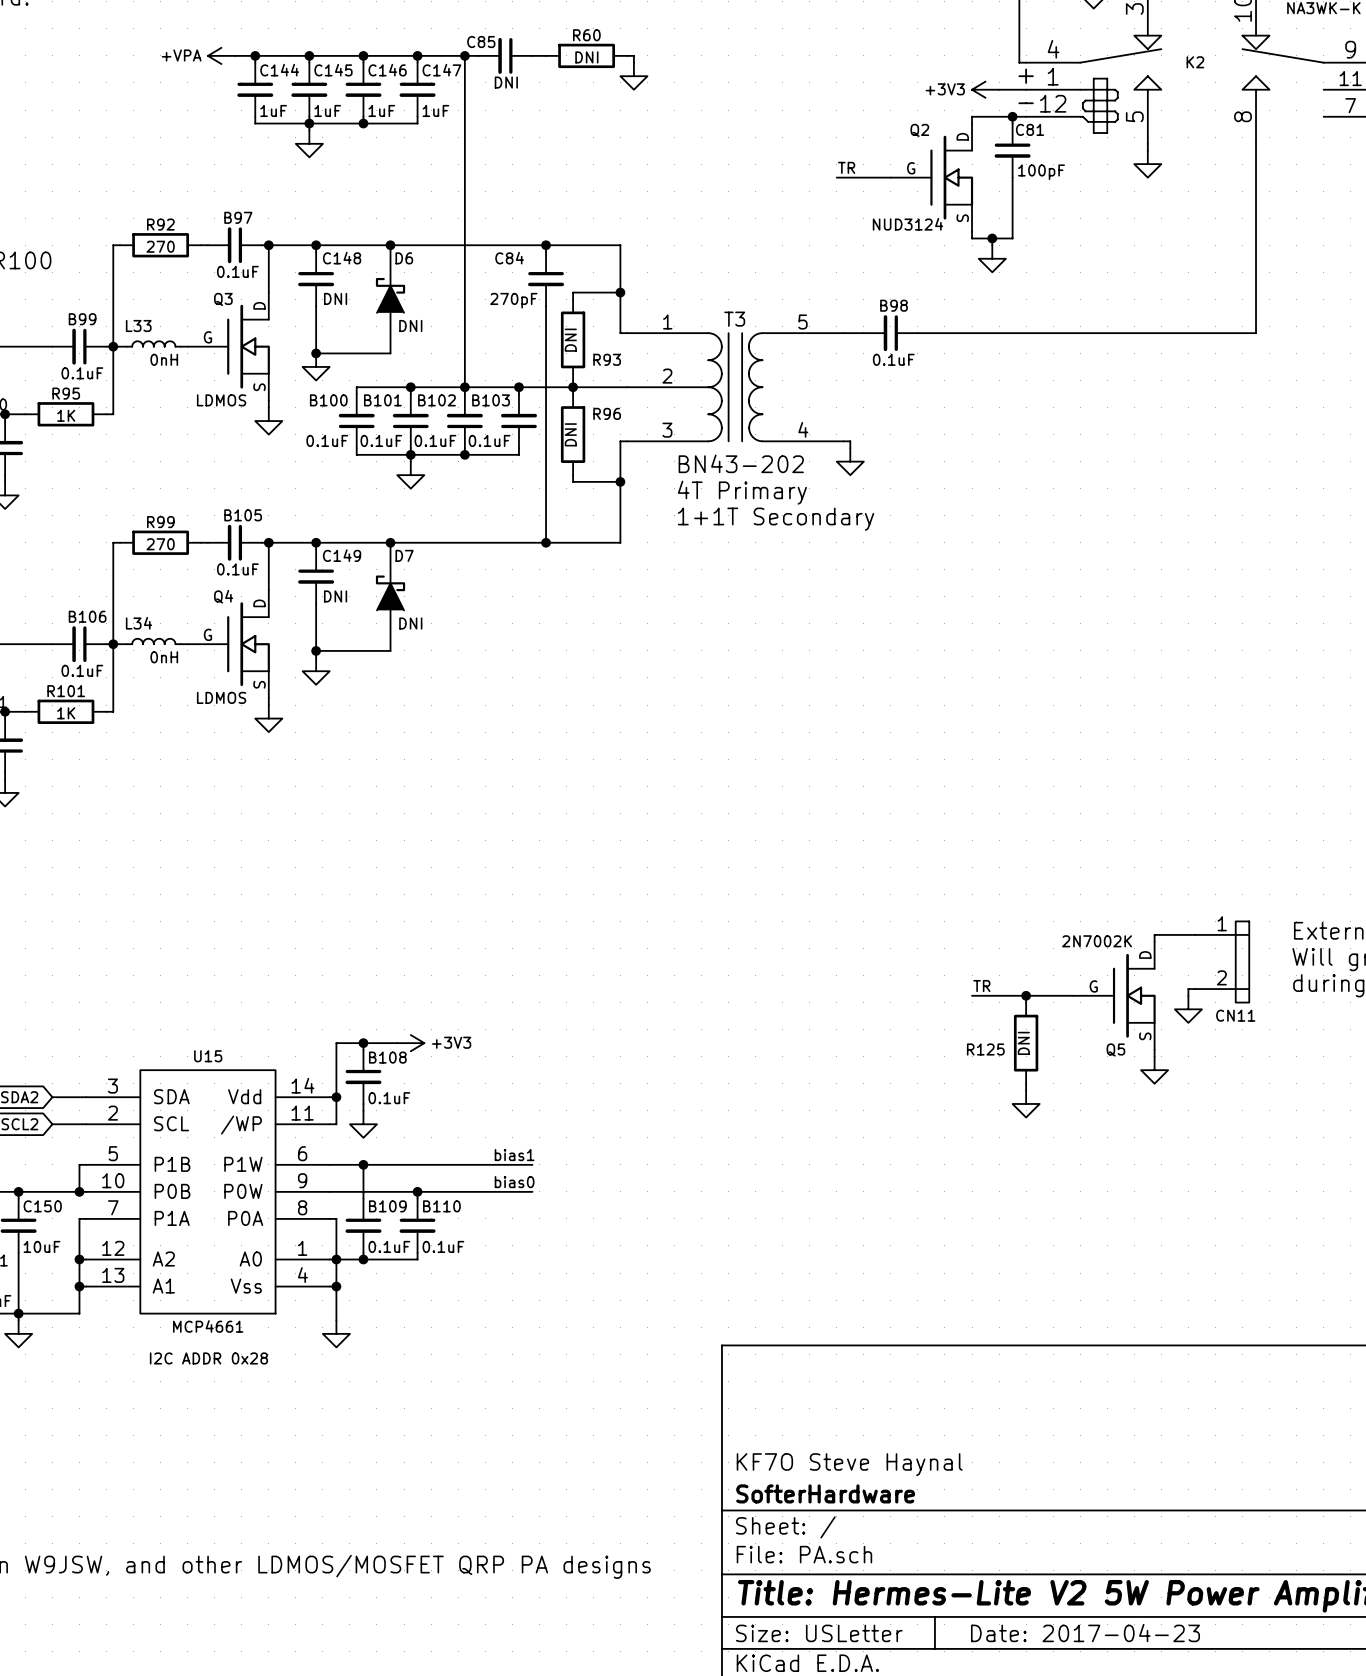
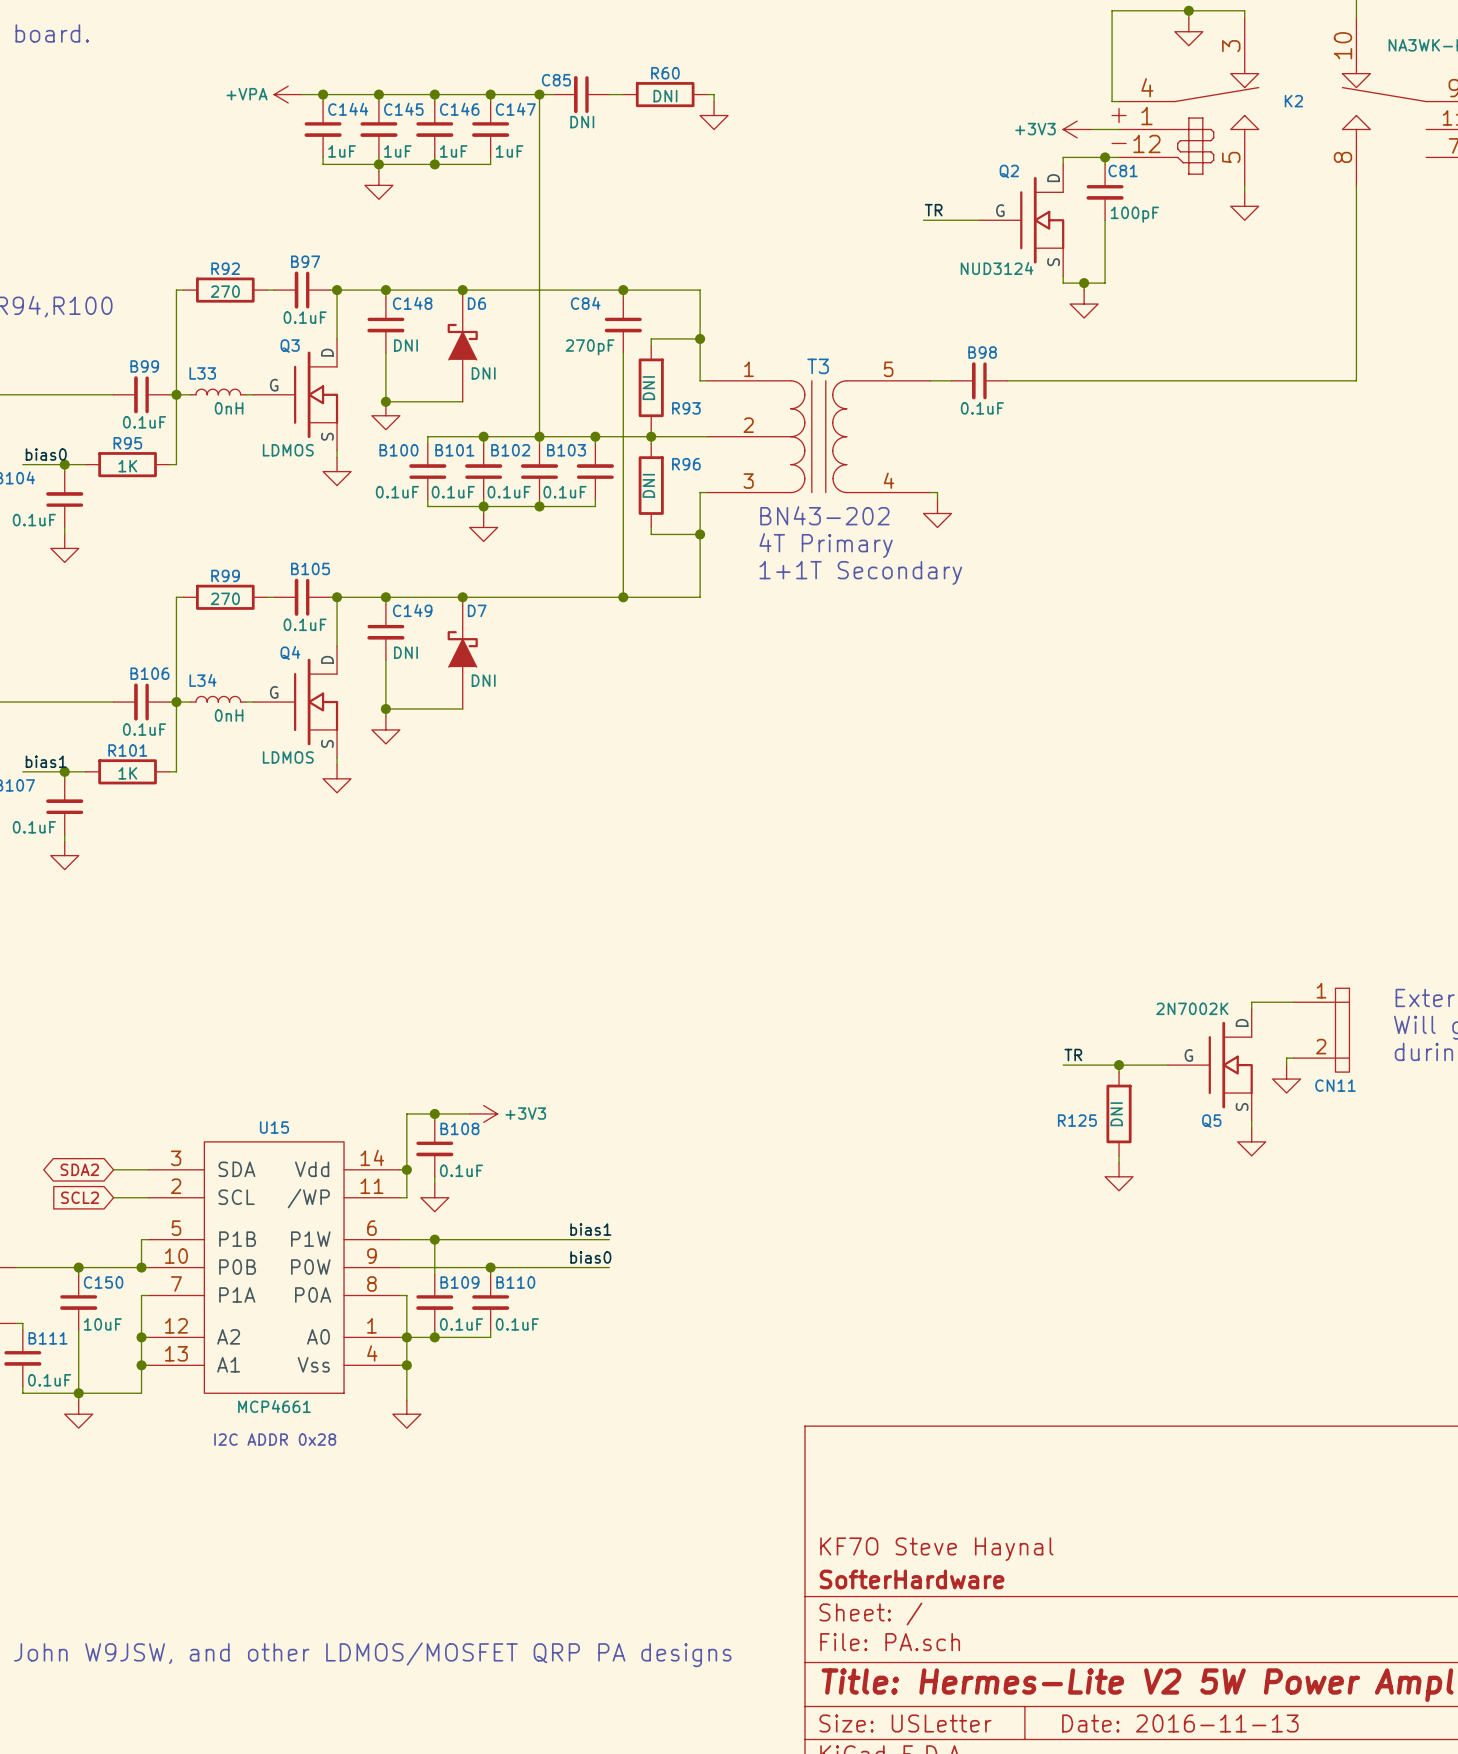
title block: Date: 2017-04-23 (1085, 1633) -> Date: 2016-11-13 (1180, 1723)

